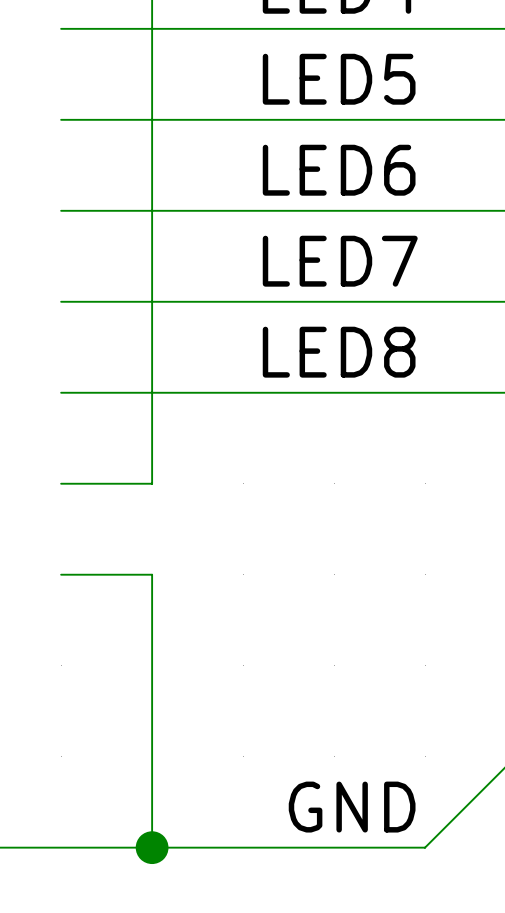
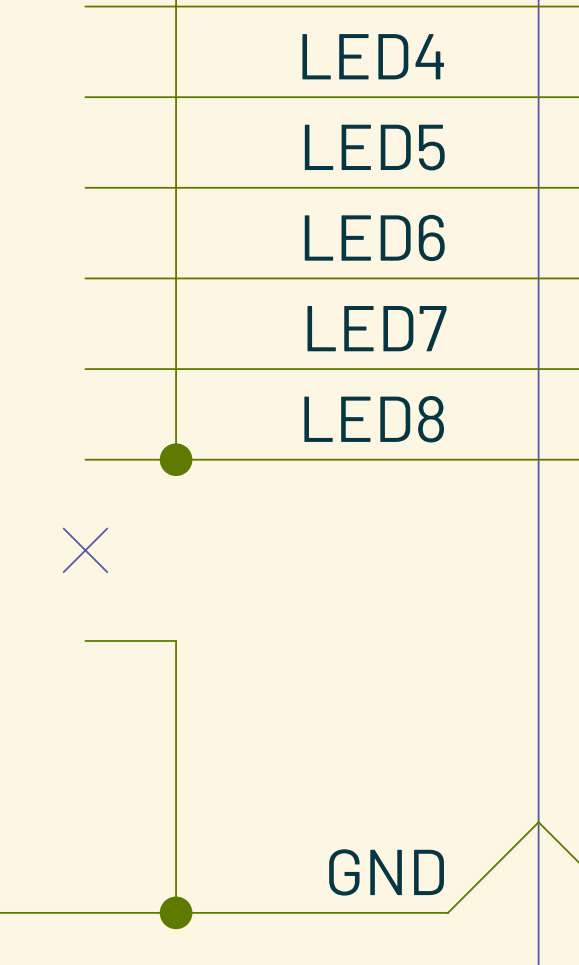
wire: (152, 392) (152, 483) (61, 483) -> none
junction: none -> (176, 459)
no-connect mark: none -> (85, 550)

